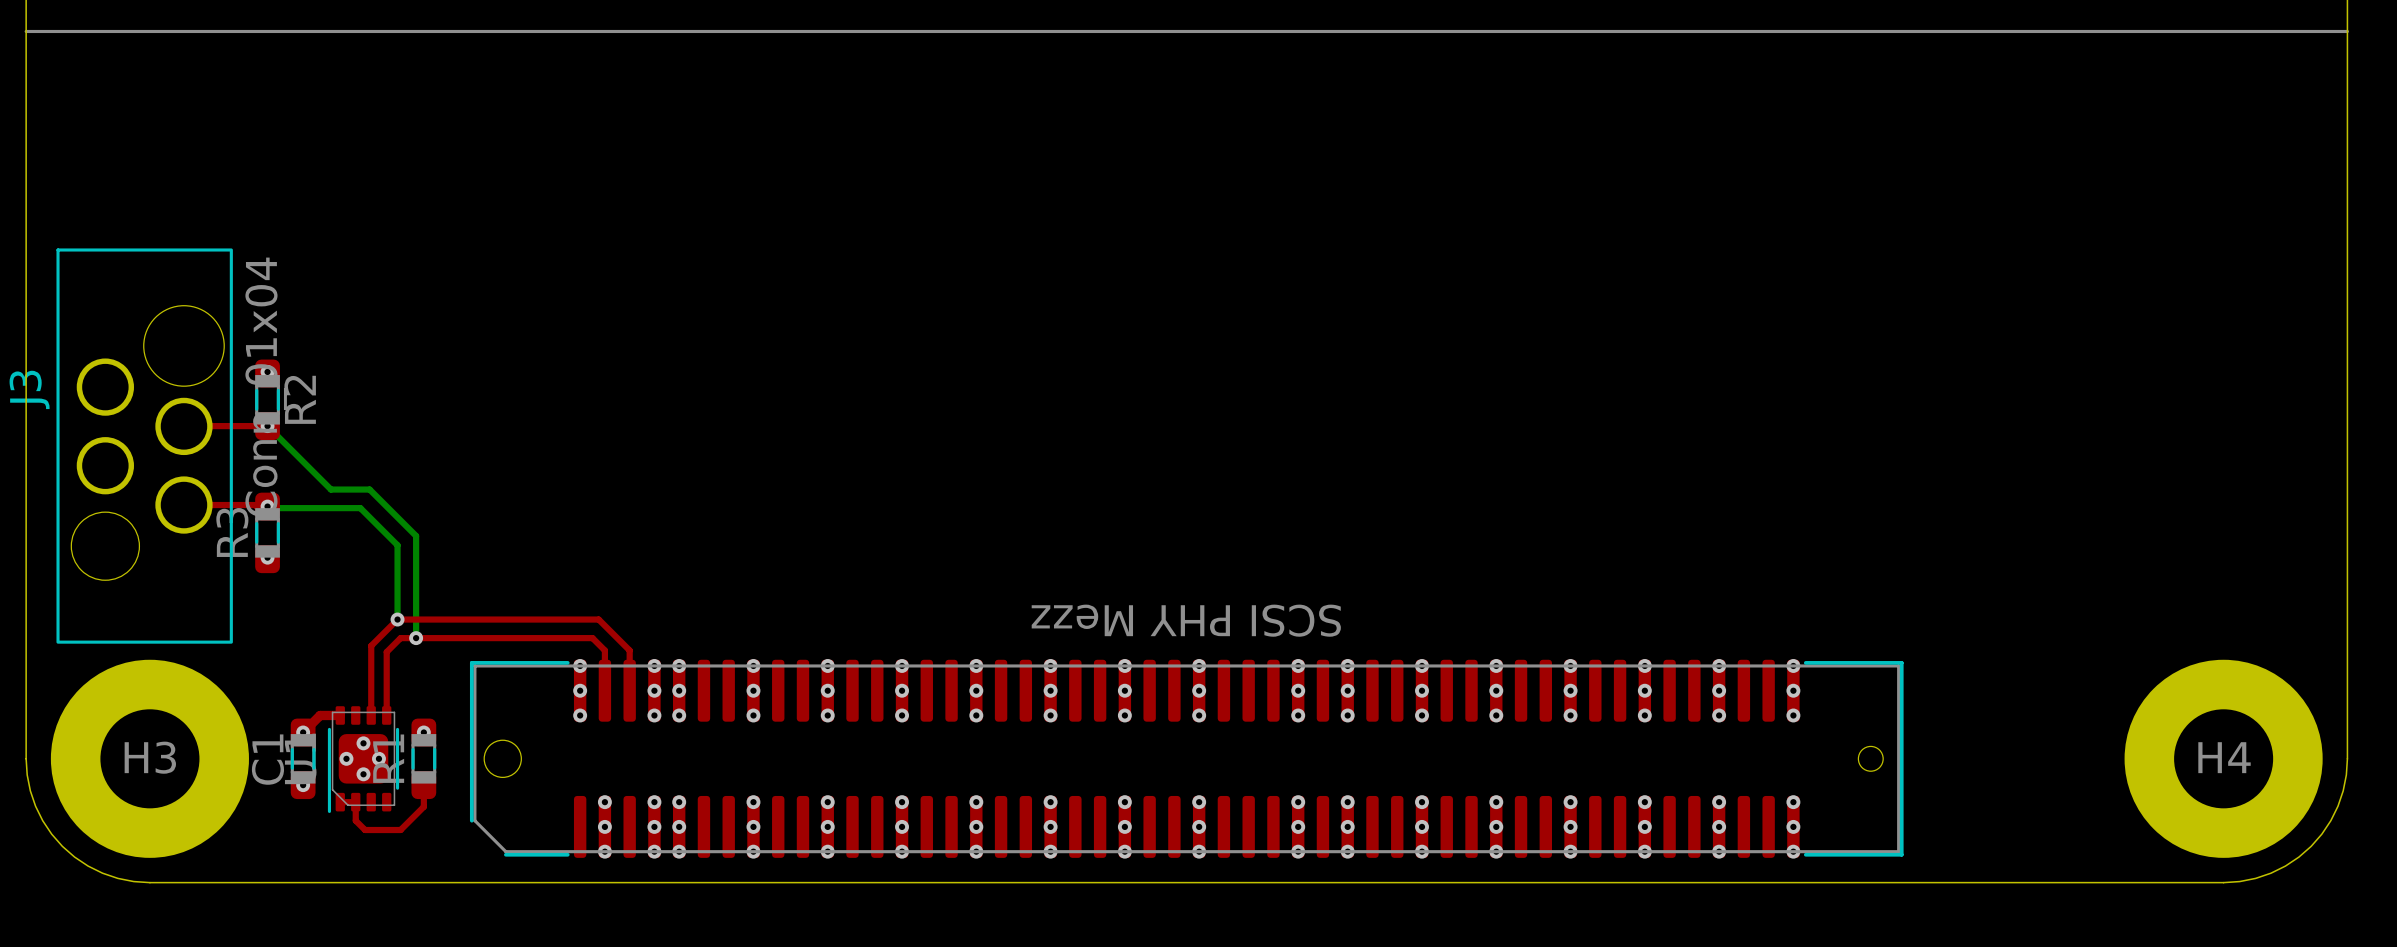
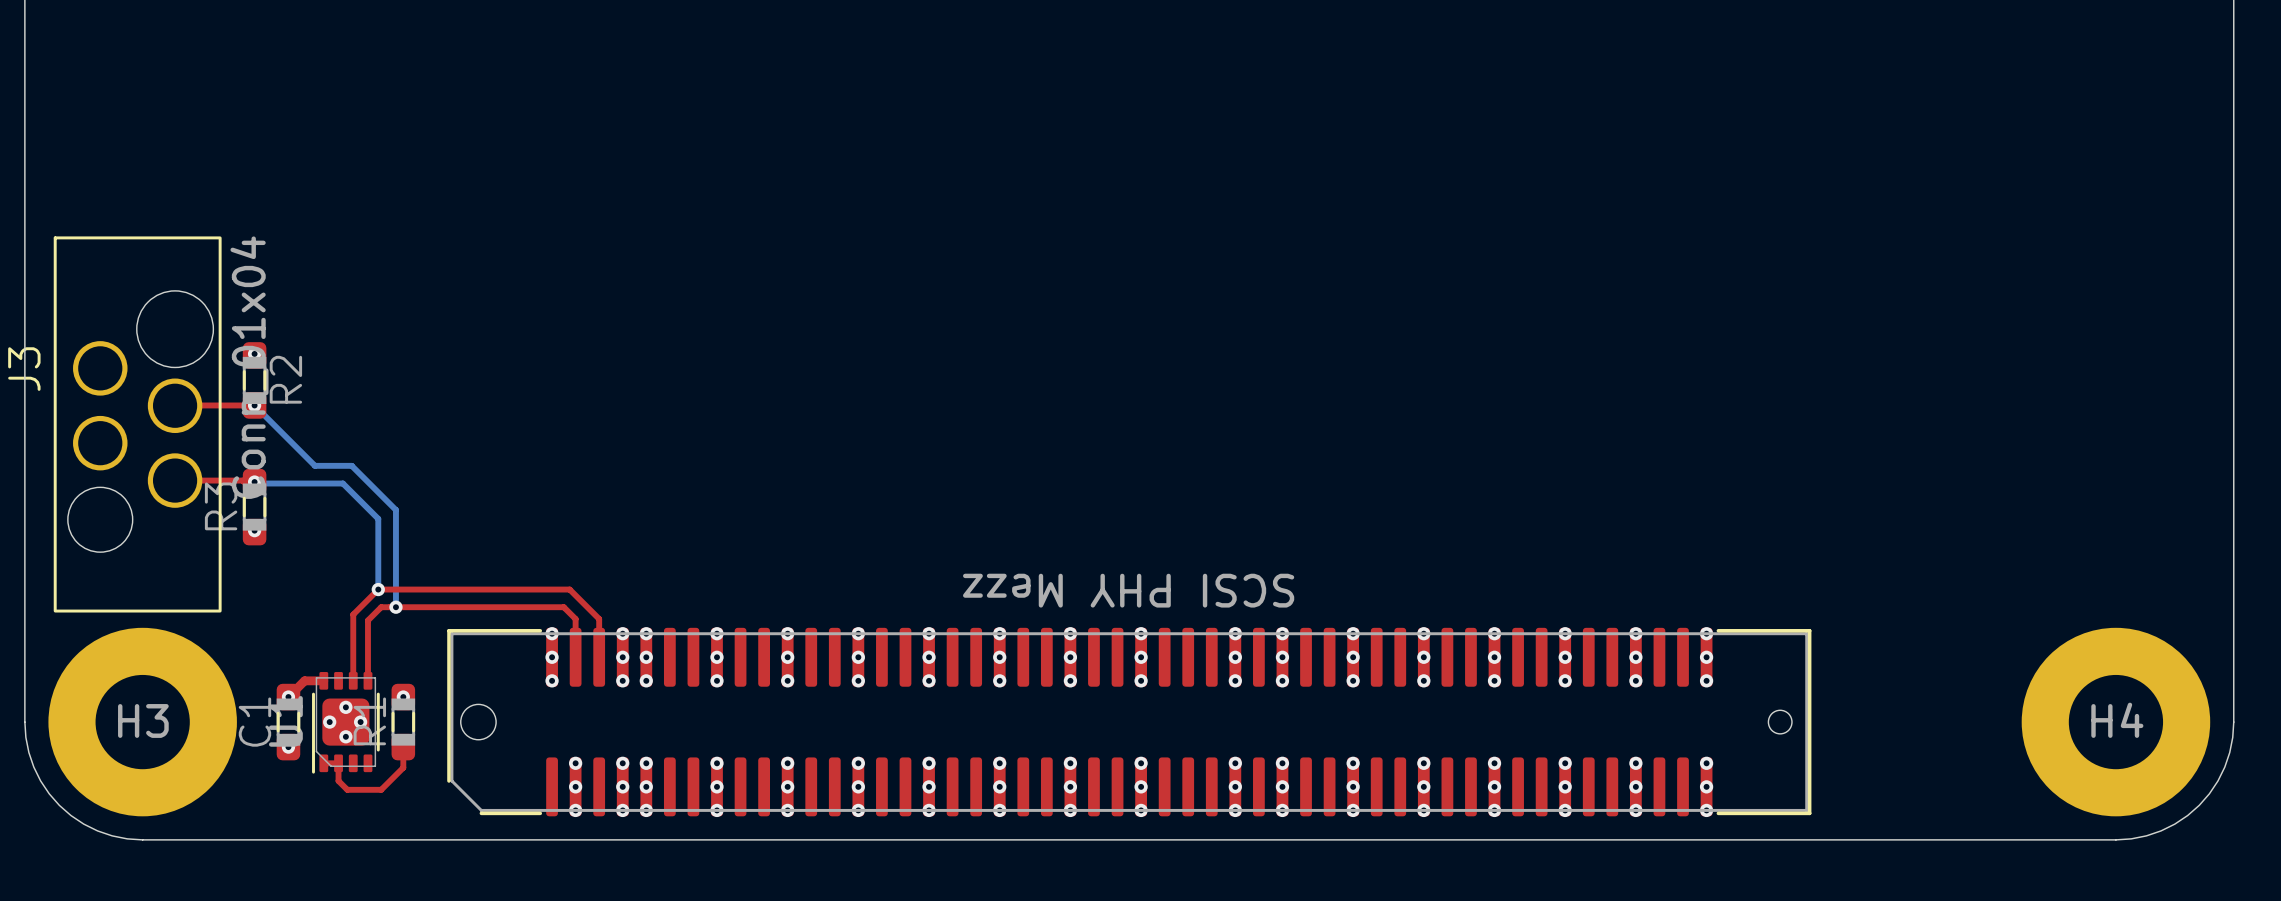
line: (26, 31) (2347, 31) -> none

